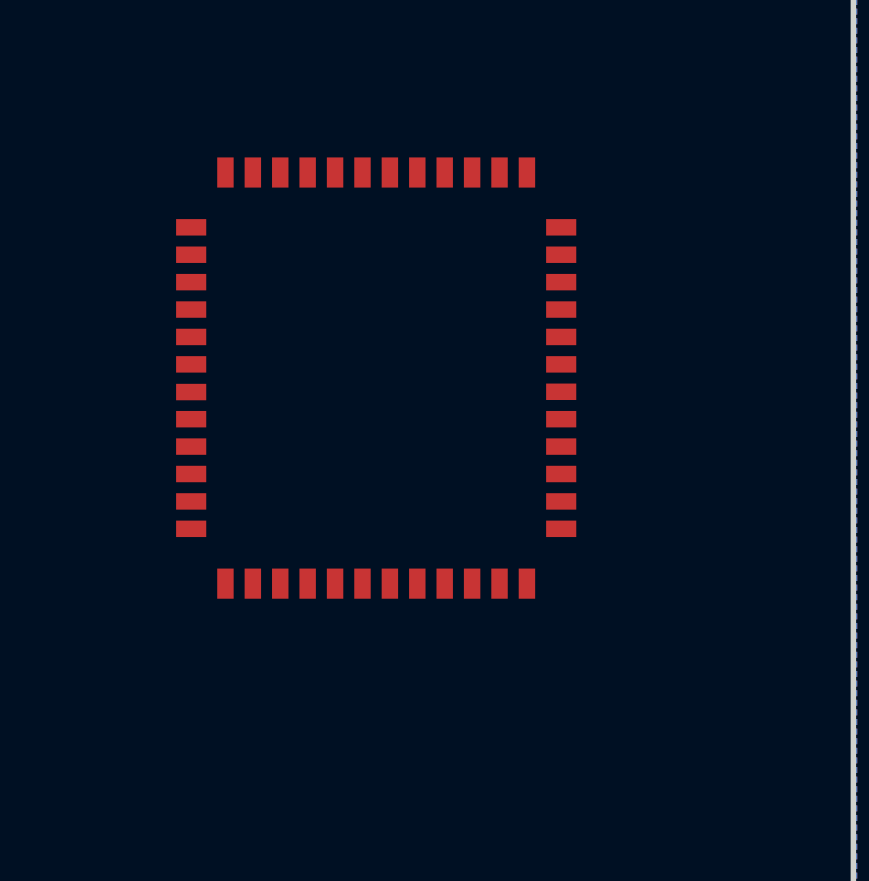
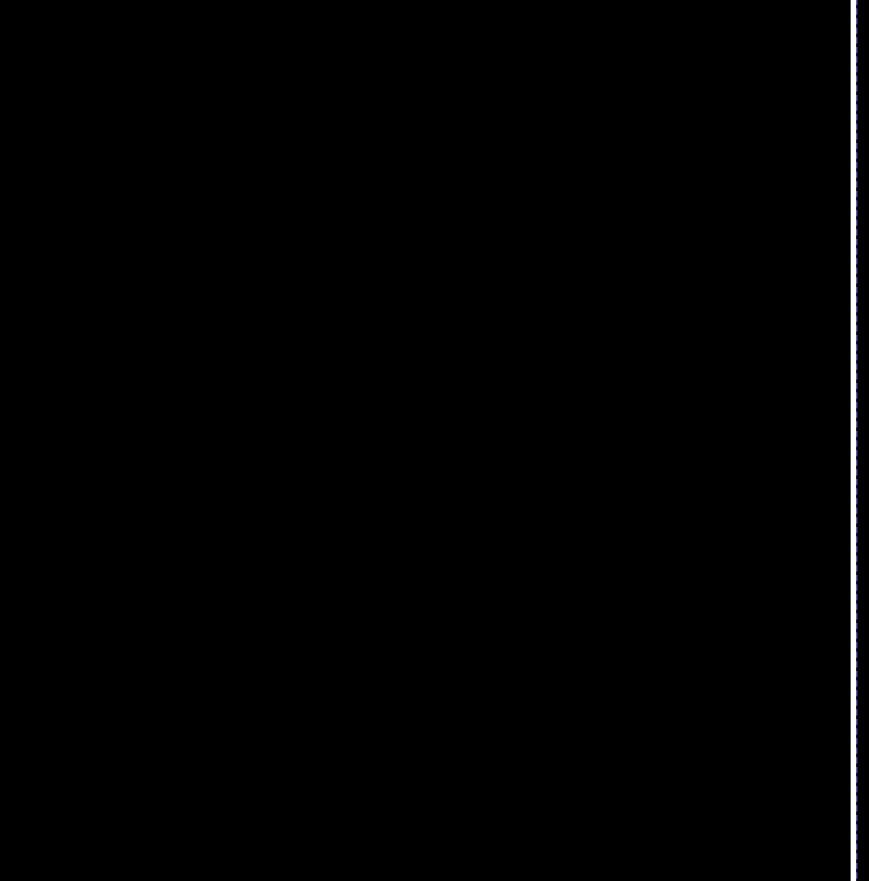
part: (376, 378) -> none

